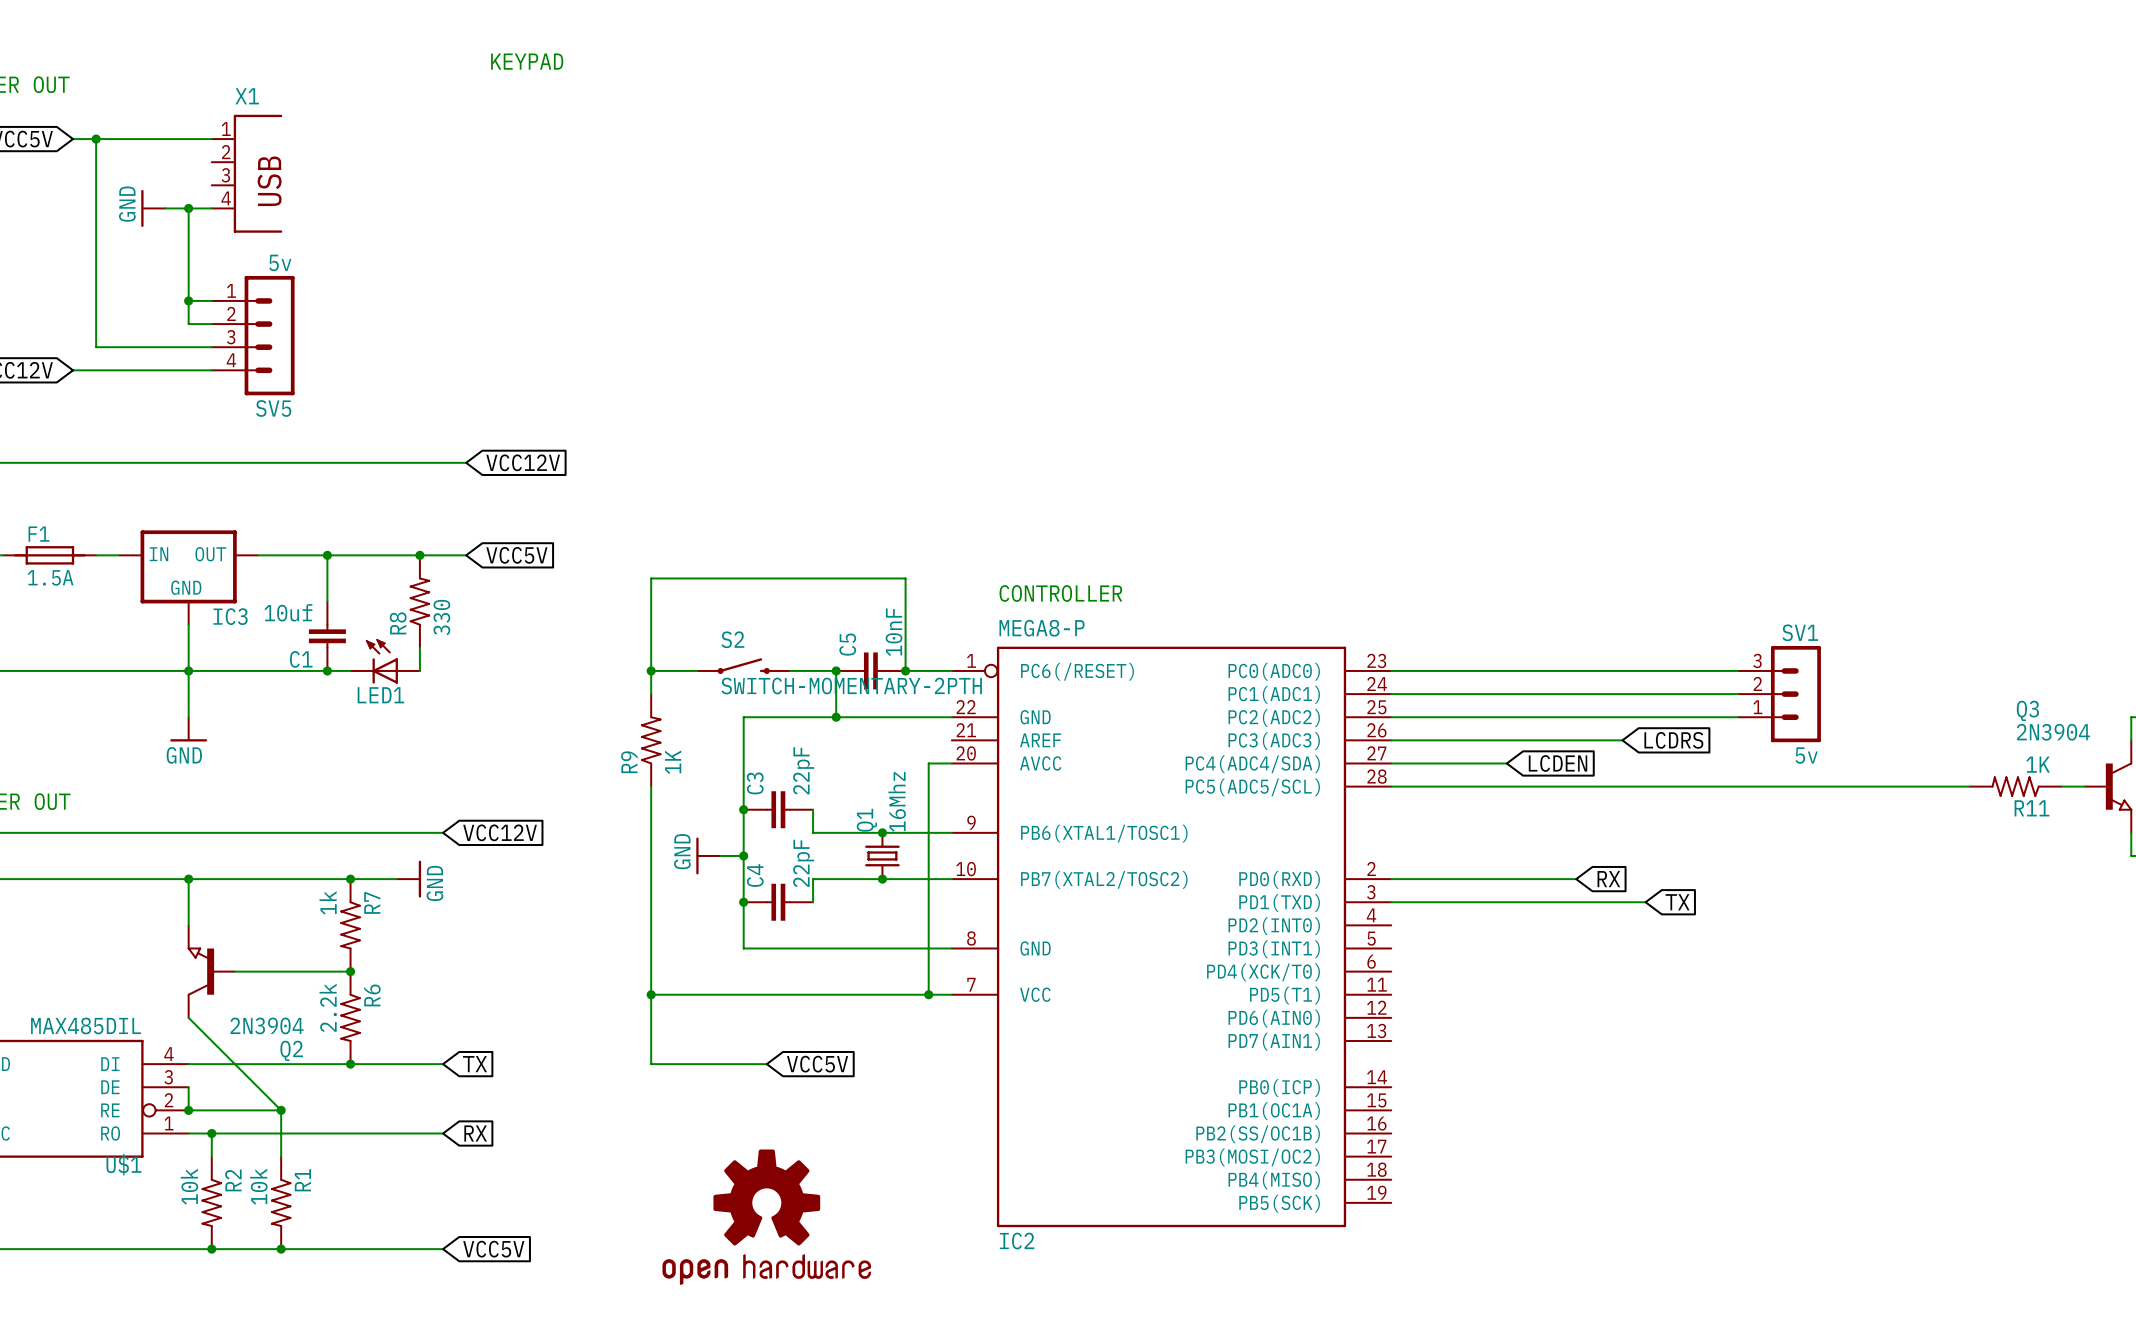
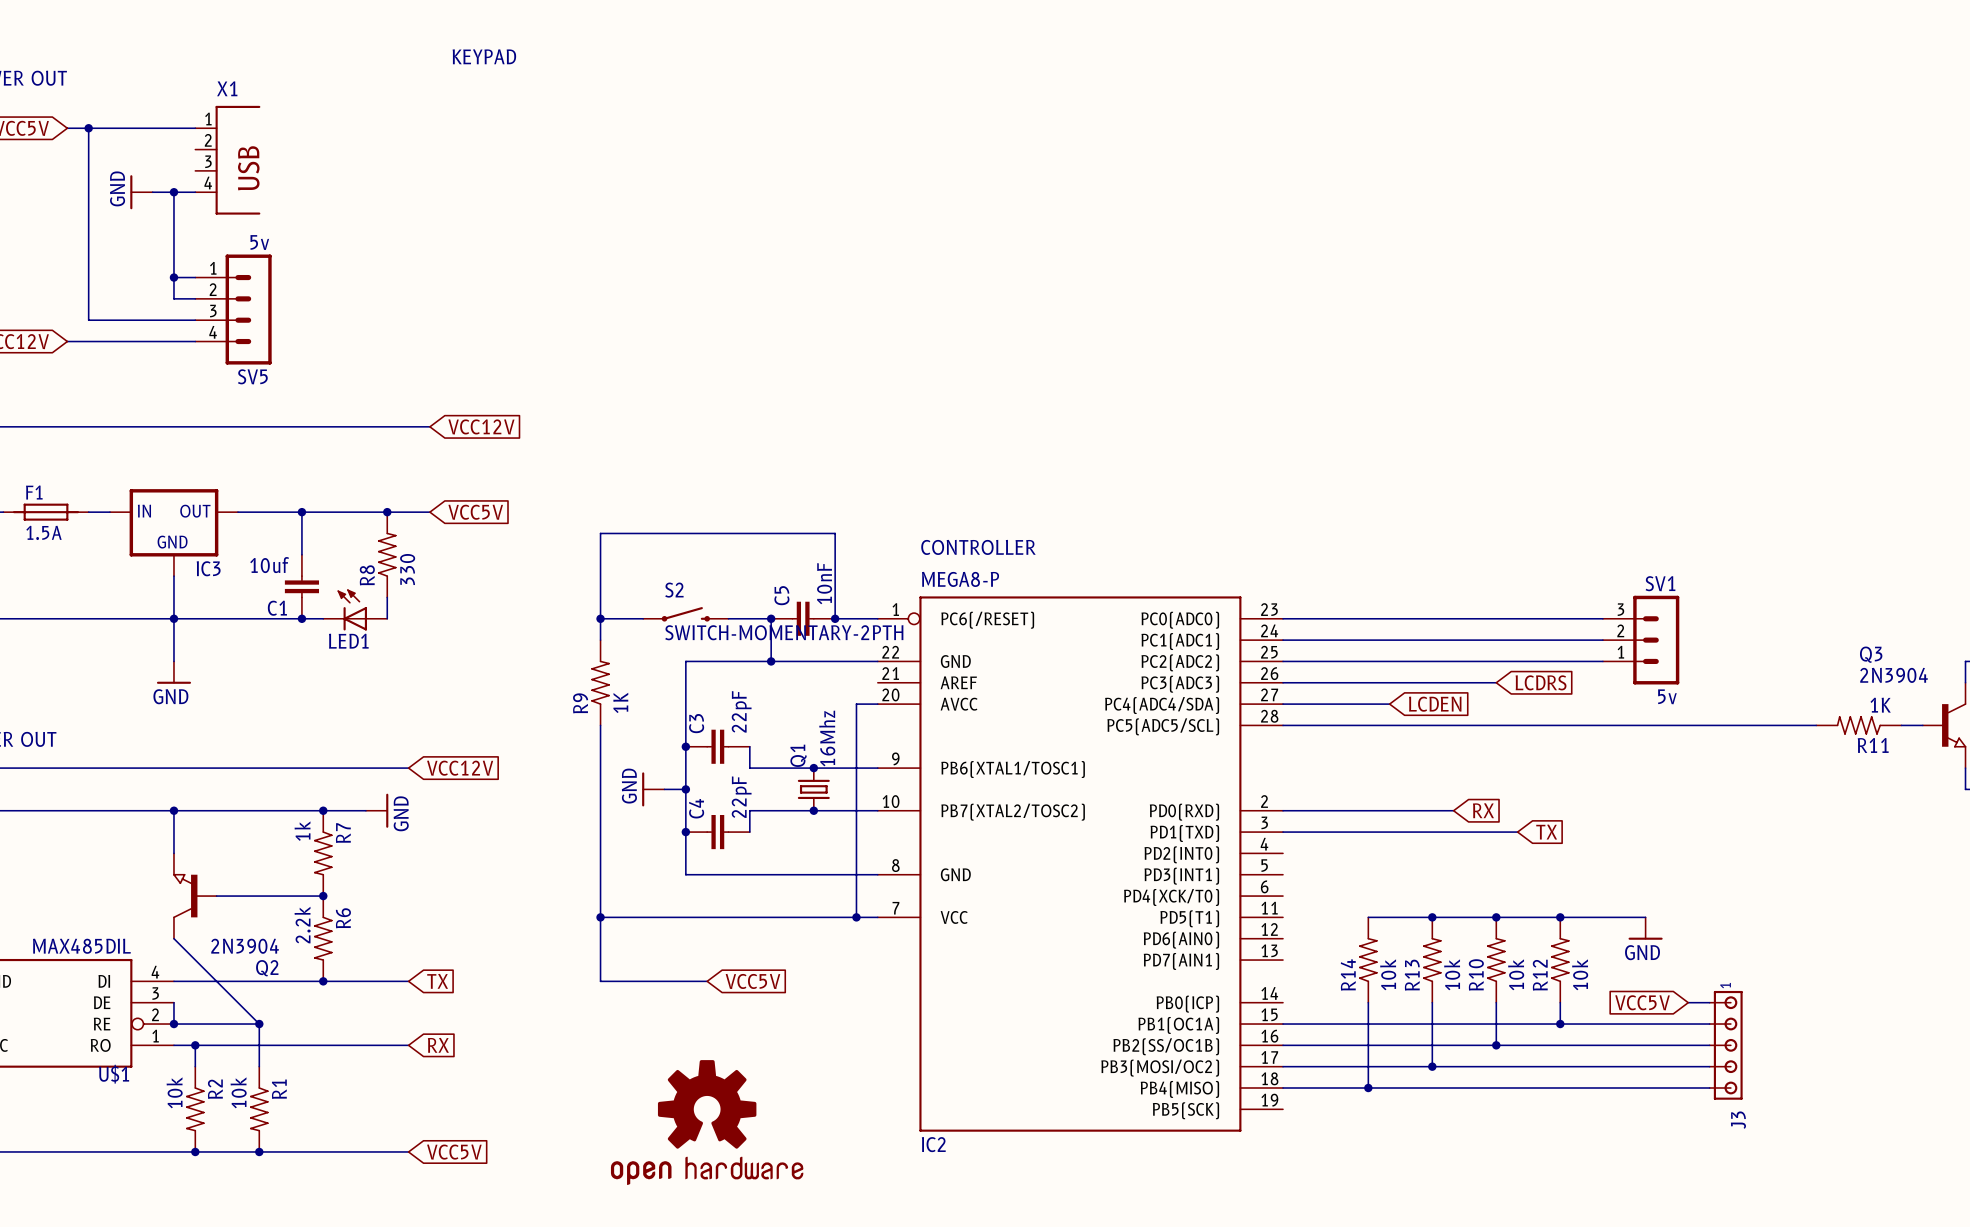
wire: none -> (1368, 917) (1645, 917)
junction: none -> (1432, 917)
junction: none -> (1496, 917)
junction: none -> (1560, 917)
power symbol: none -> GND (1645, 928)
R14: none -> 10k (1368, 960)
R13: none -> 10k (1432, 960)
R10: none -> 10k (1496, 960)
R12: none -> 10k (1560, 960)
wire: none -> (1368, 1002) (1368, 1087)
wire: none -> (1432, 1002) (1432, 1066)
wire: none -> (1496, 1002) (1496, 1045)
wire: none -> (1560, 1002) (1560, 1024)
global label: none -> VCC5V (1642, 1002)
wire: none -> (1688, 1002) (1709, 1002)
wire: none -> (1283, 1024) (1709, 1024)
junction: none -> (1560, 1024)
wire: none -> (1283, 1045) (1709, 1045)
junction: none -> (1496, 1045)
J3: none -> (1726, 1045)
wire: none -> (1283, 1066) (1709, 1066)
junction: none -> (1432, 1066)
wire: none -> (1283, 1087) (1709, 1087)
junction: none -> (1368, 1087)

